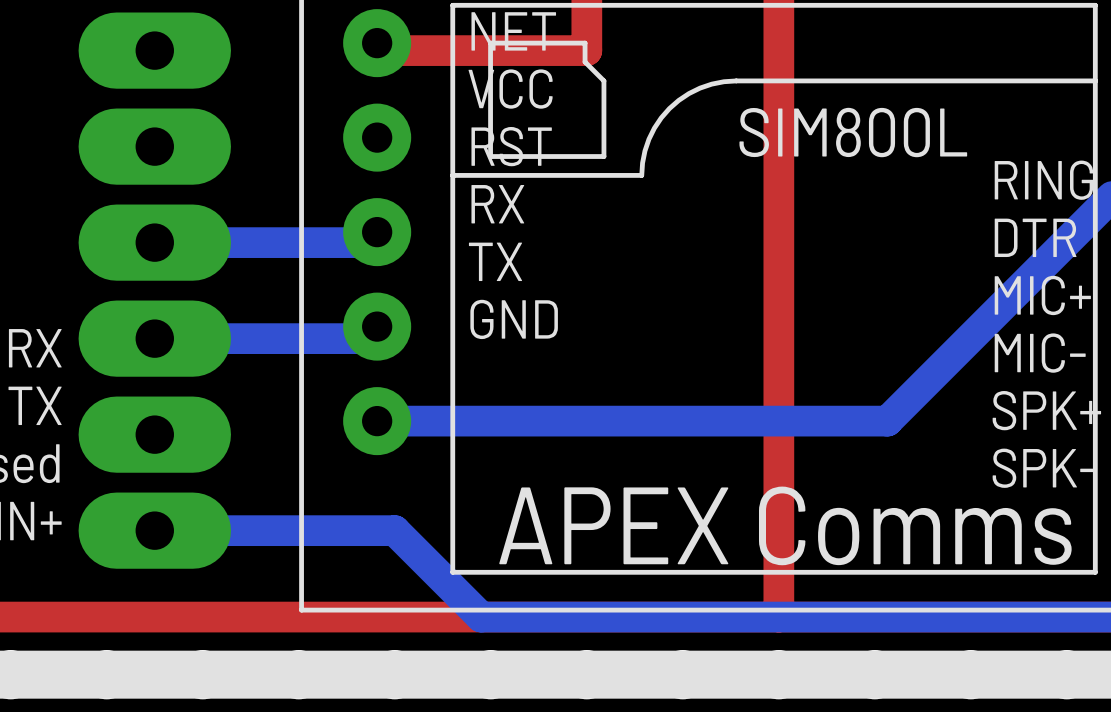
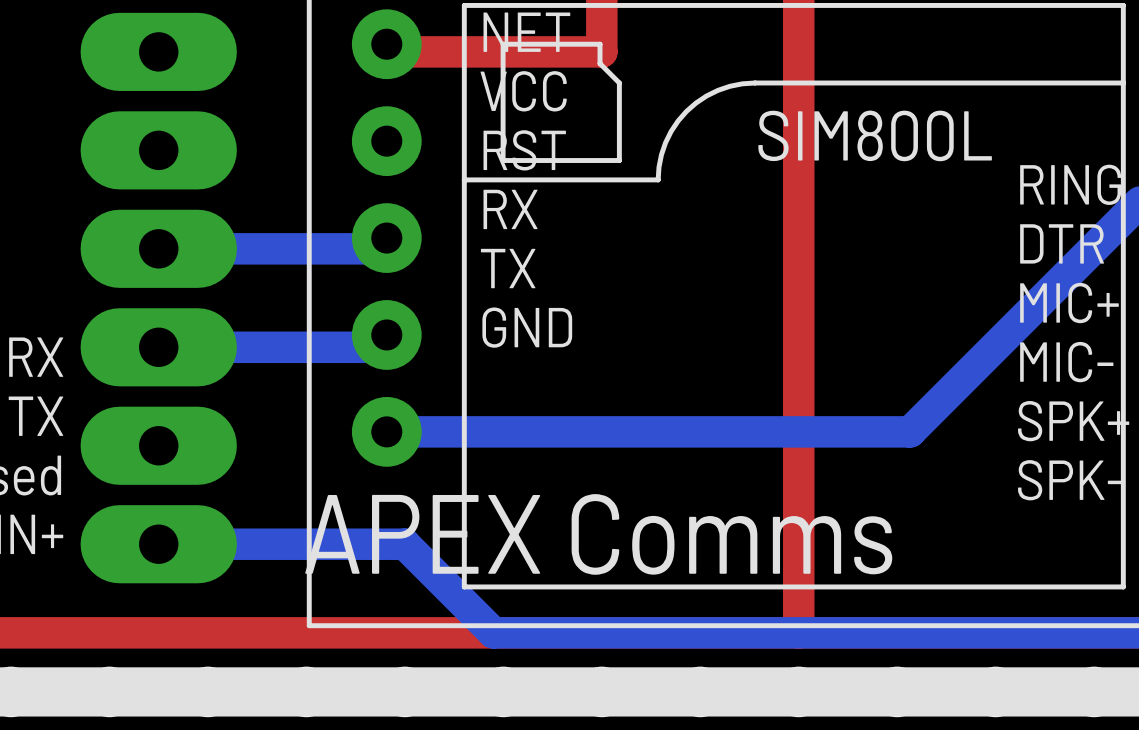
text position: APEX Comms (785, 525) -> APEX Comms (598, 534)

